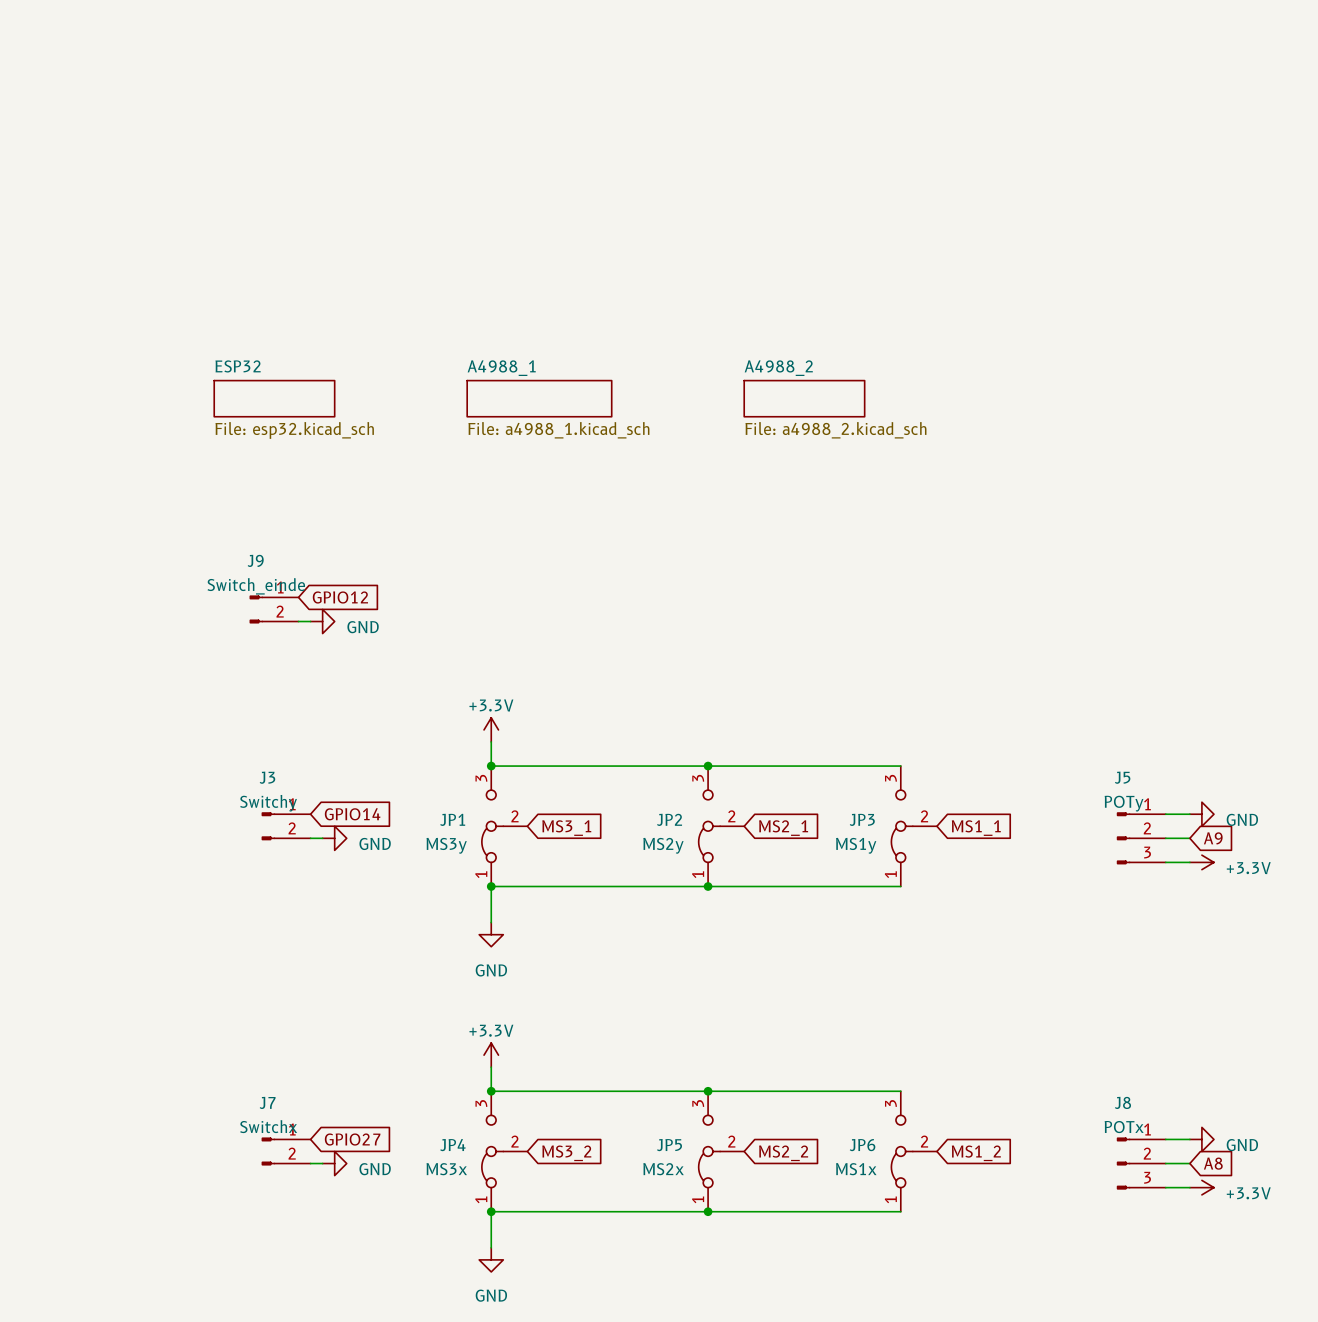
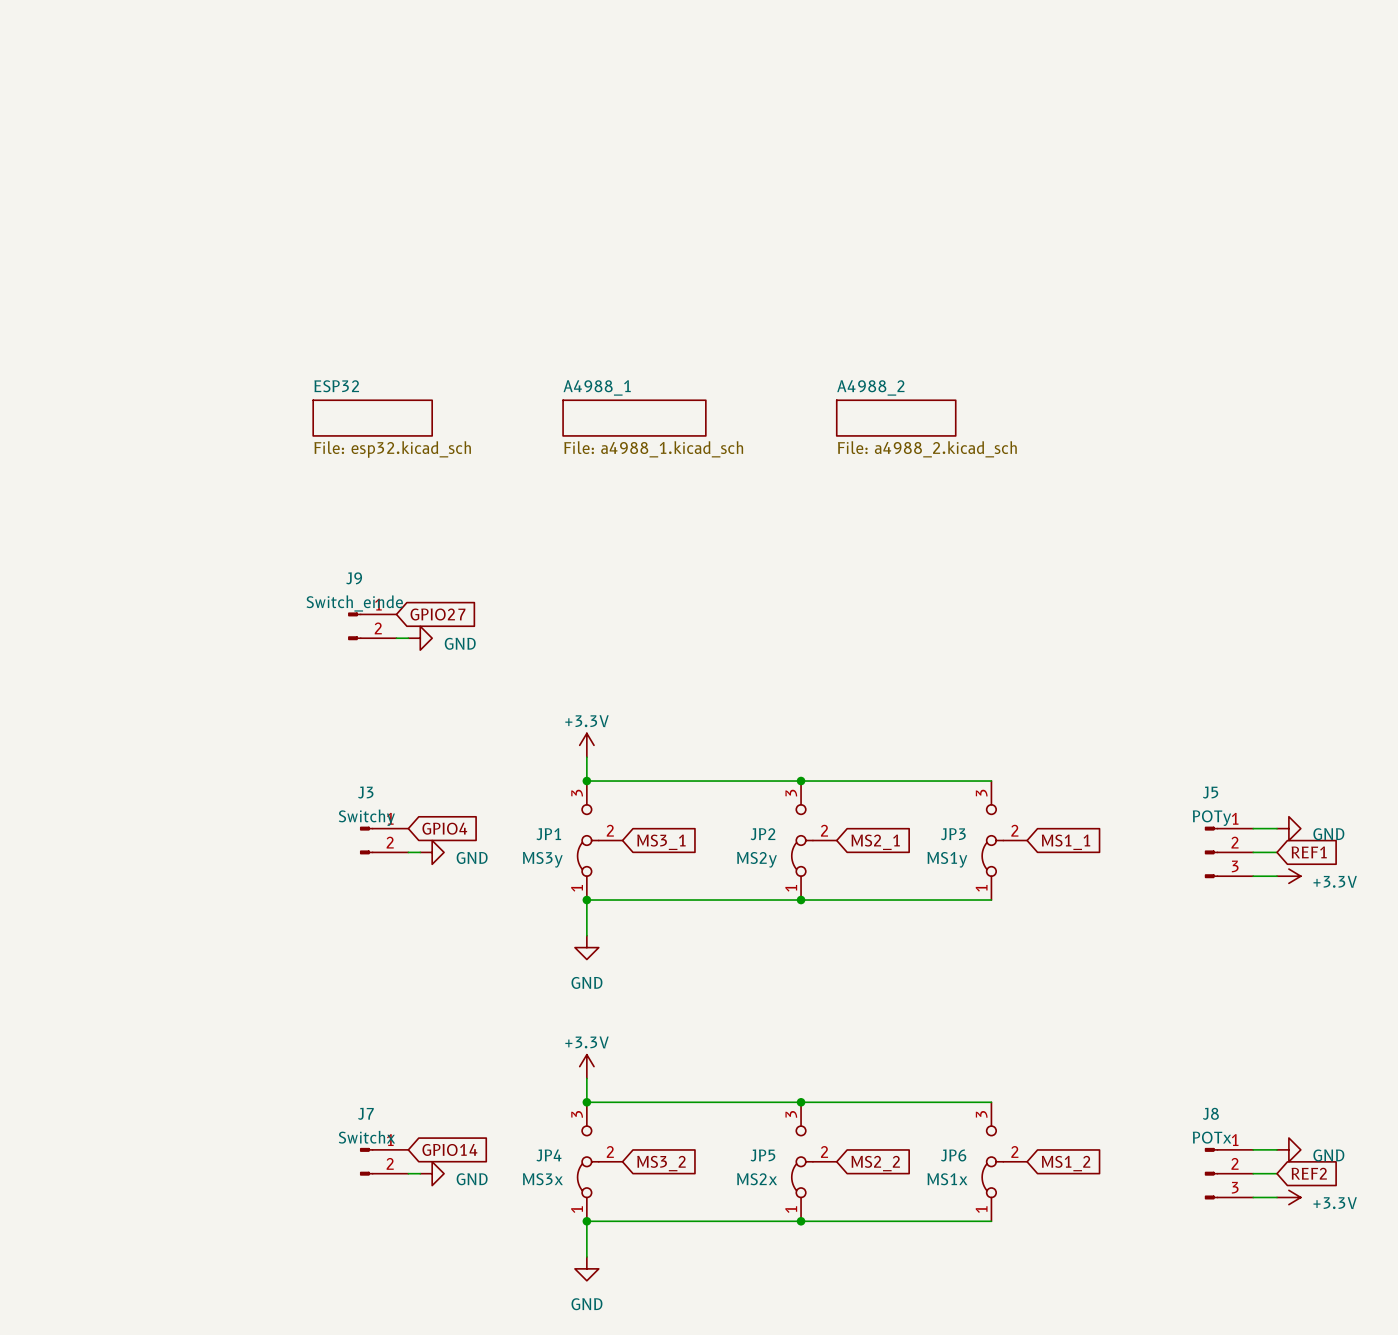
global label: GPIO12 (340, 597) -> GPIO27 (437, 614)
global label: GPIO14 (352, 814) -> GPIO4 (444, 828)
global label: A9 (1213, 838) -> REF1 (1309, 852)
global label: GPIO27 (352, 1139) -> GPIO14 (449, 1149)
global label: A8 (1213, 1163) -> REF2 (1309, 1173)

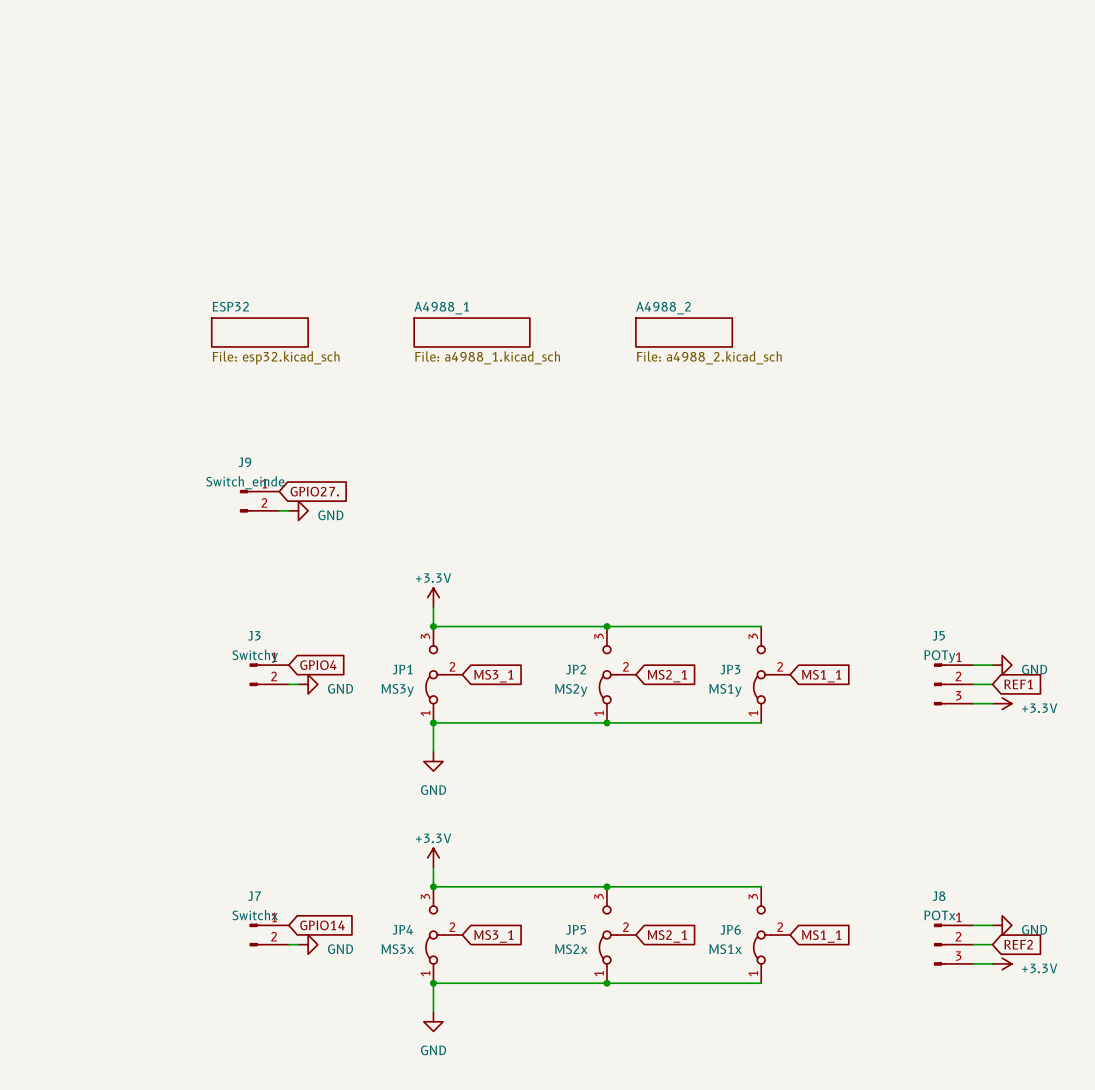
global label: GPIO27 (437, 614) -> GPIO27. (314, 491)
global label: MS3_2 (661, 1163) -> MS3_1 (493, 936)
global label: MS2_2 (875, 1163) -> MS2_1 (667, 936)
global label: MS1_2 (1066, 1163) -> MS1_1 (821, 936)

